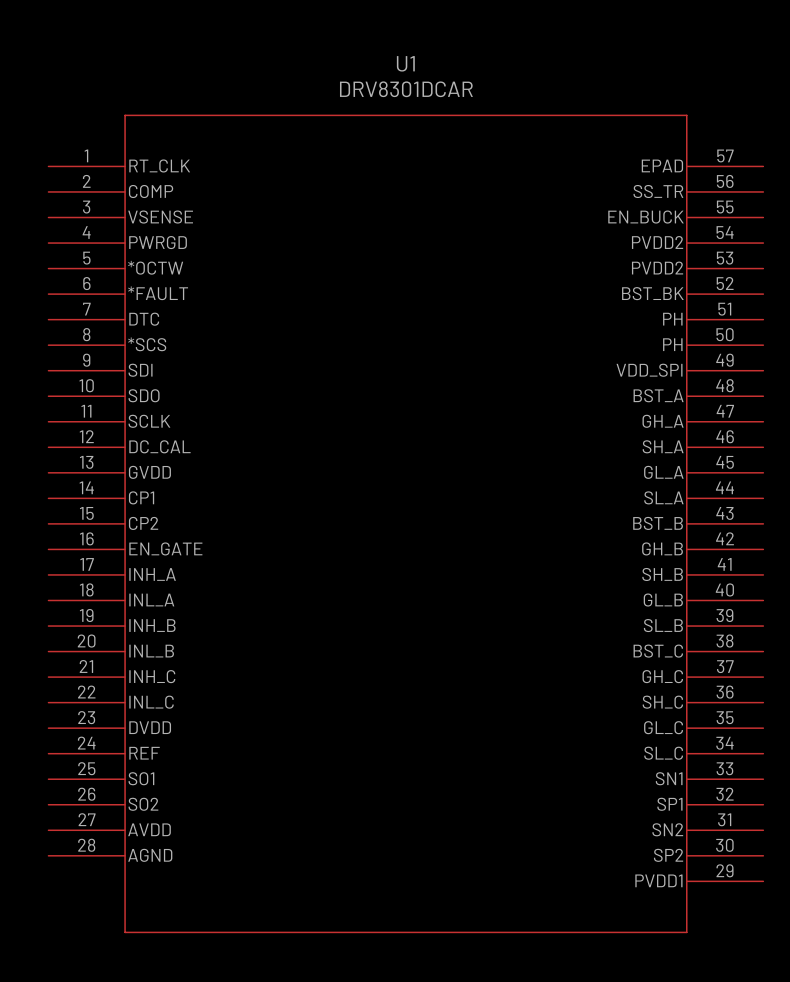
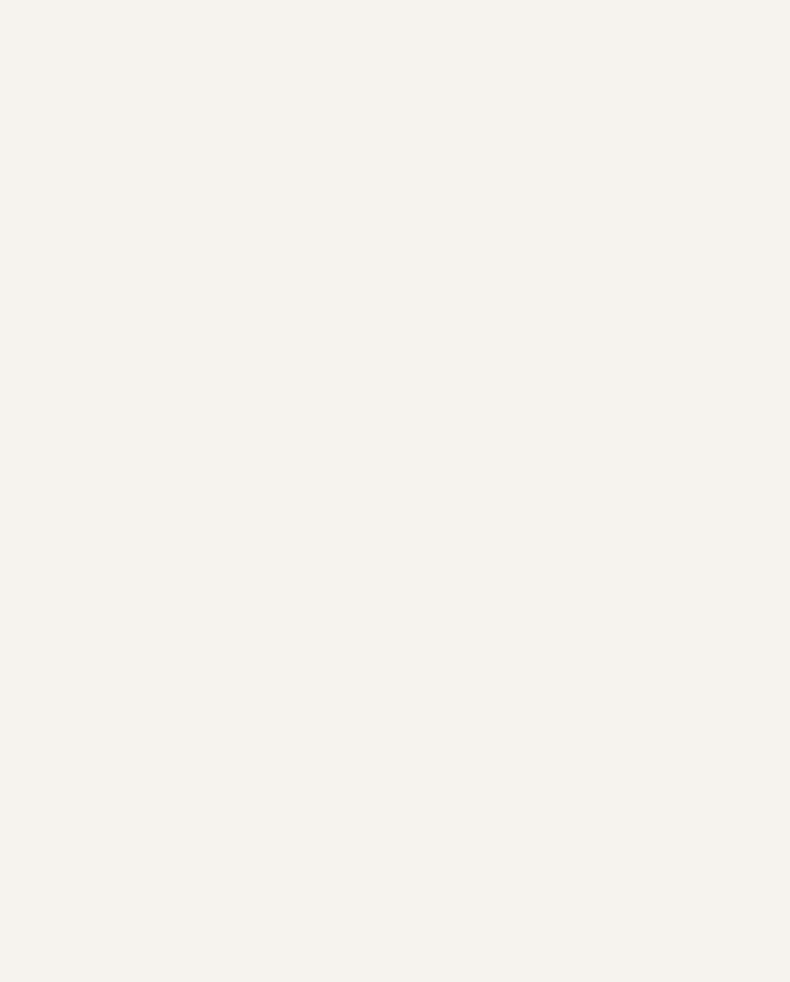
U1: DRV8301DCAR (405, 523) -> none

